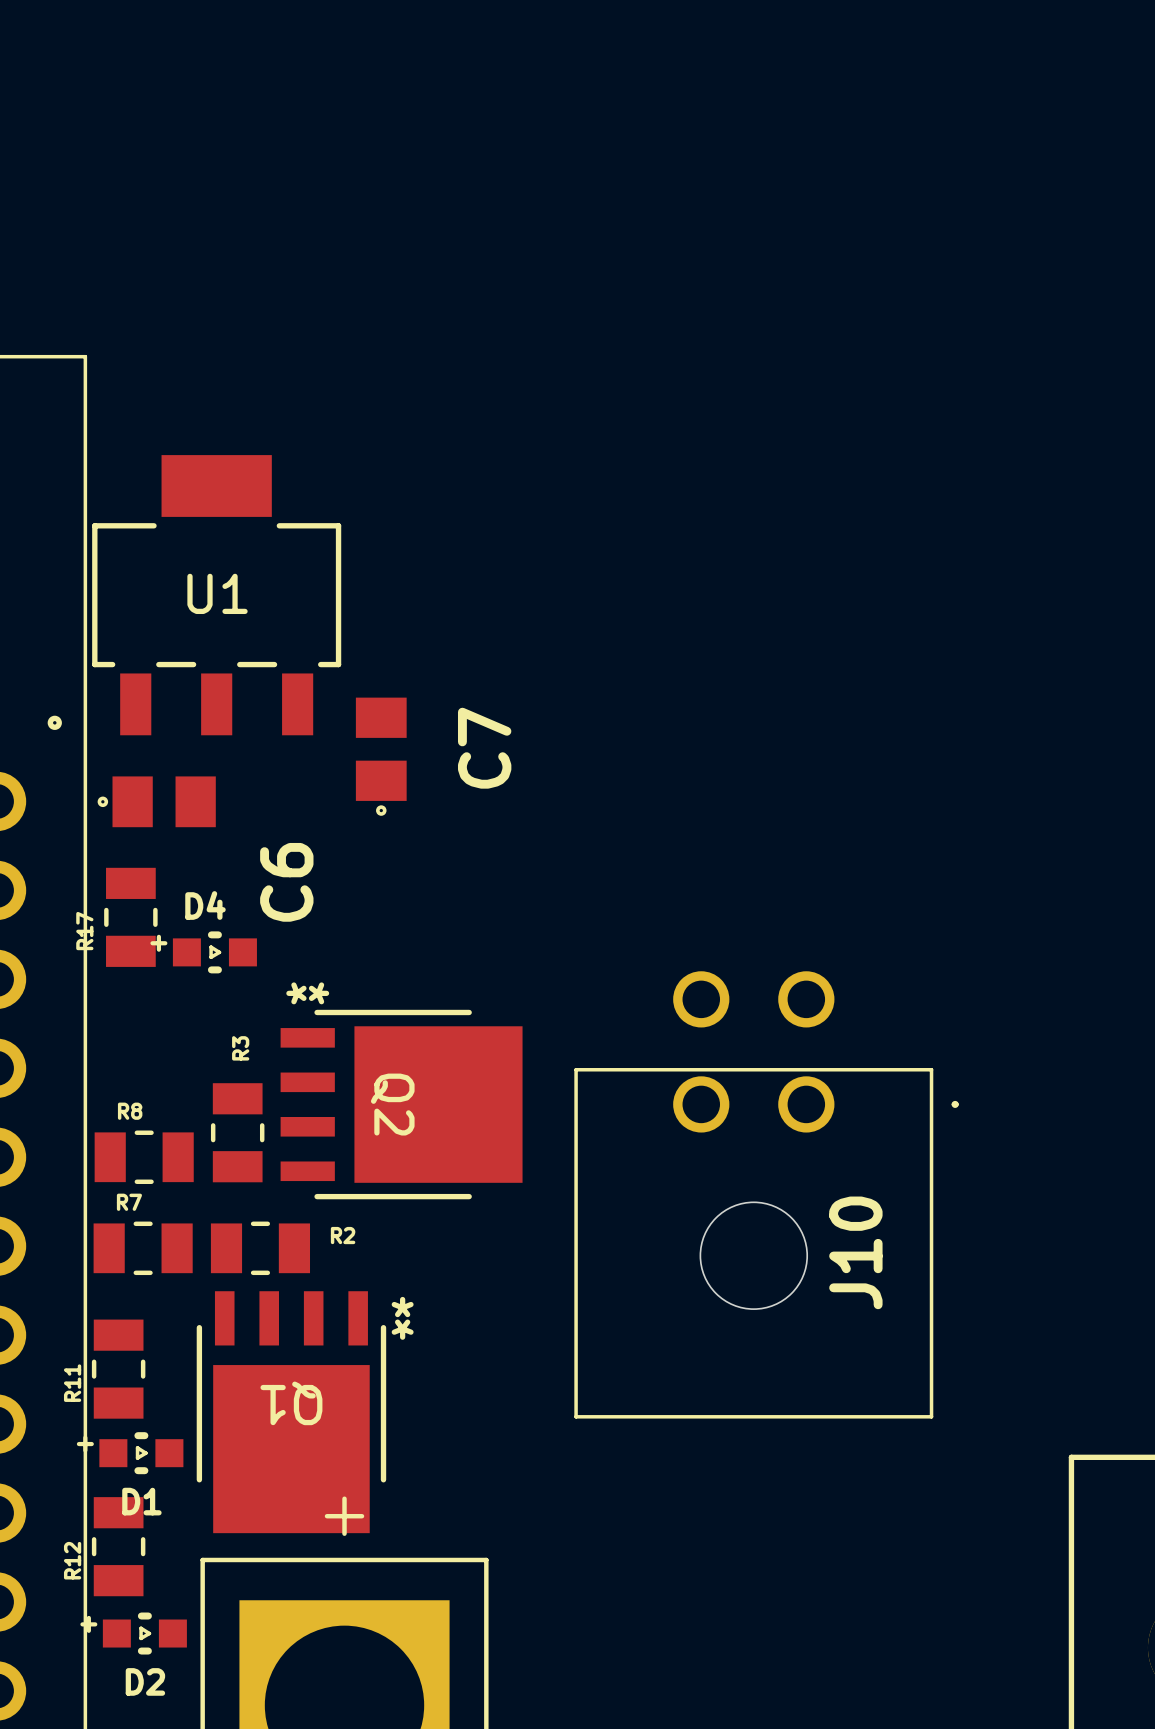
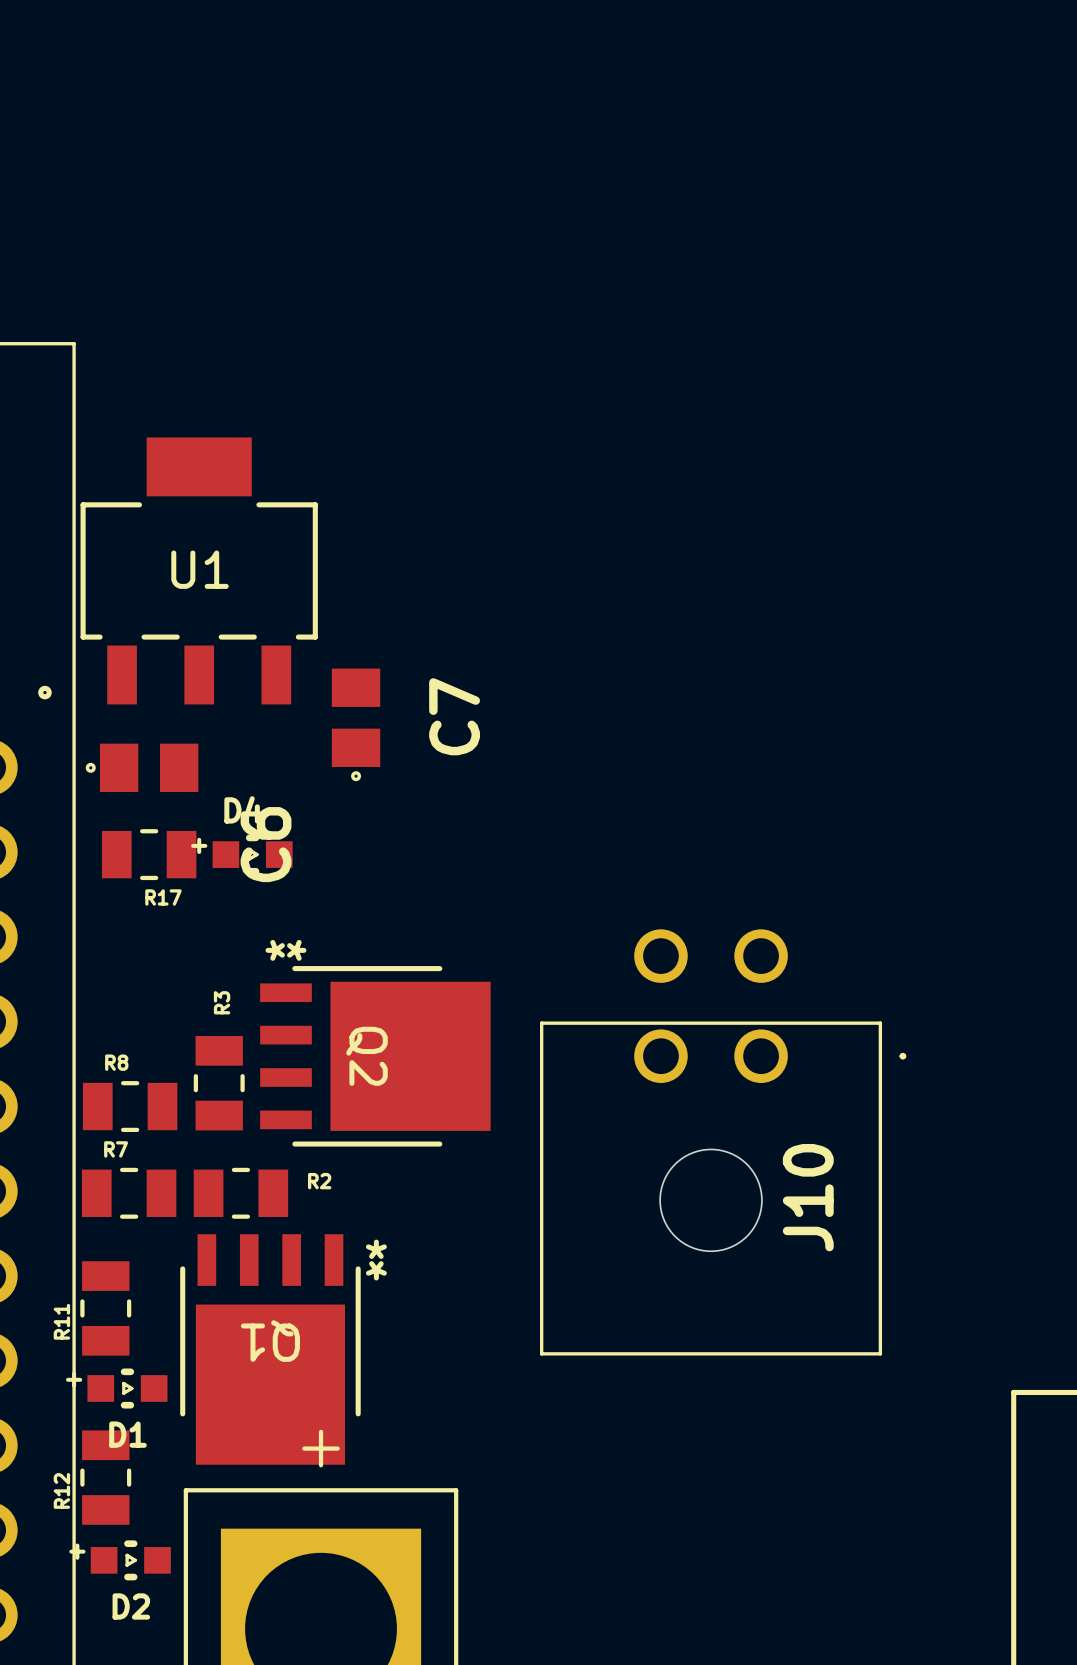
R17 rotation: 0° (130, 917) -> 90° clockwise (149, 854)
D4 position: (214, 952) -> (252, 854)

